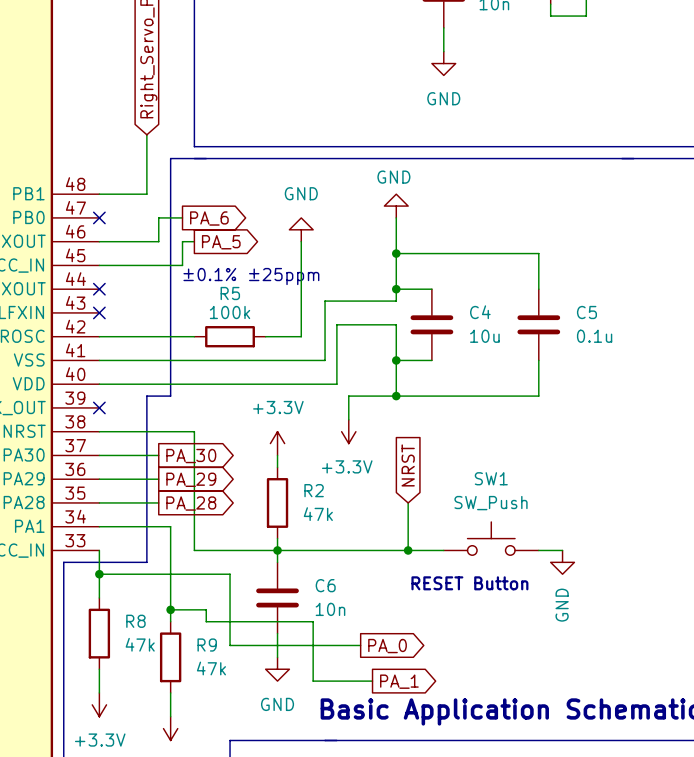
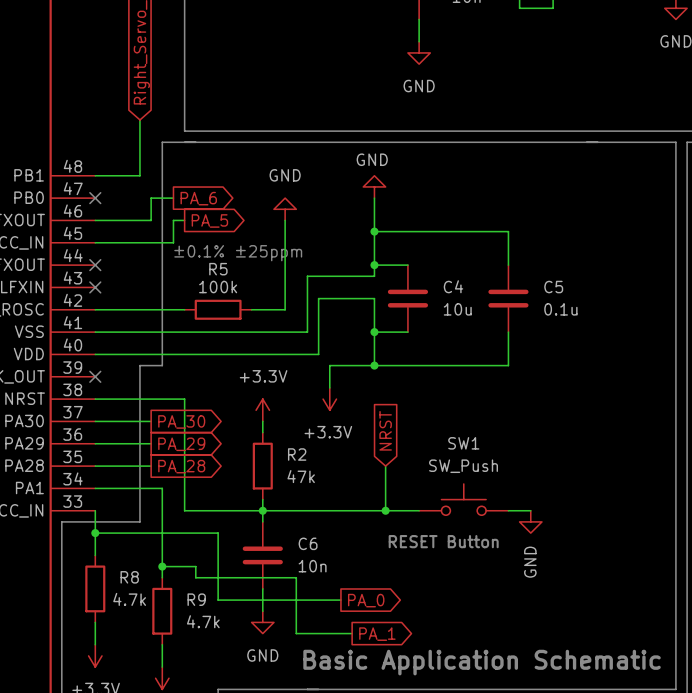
R8 value: 47k (140, 644) -> 4.7k (129, 599)
R9 value: 47k (211, 668) -> 4.7k (203, 621)

